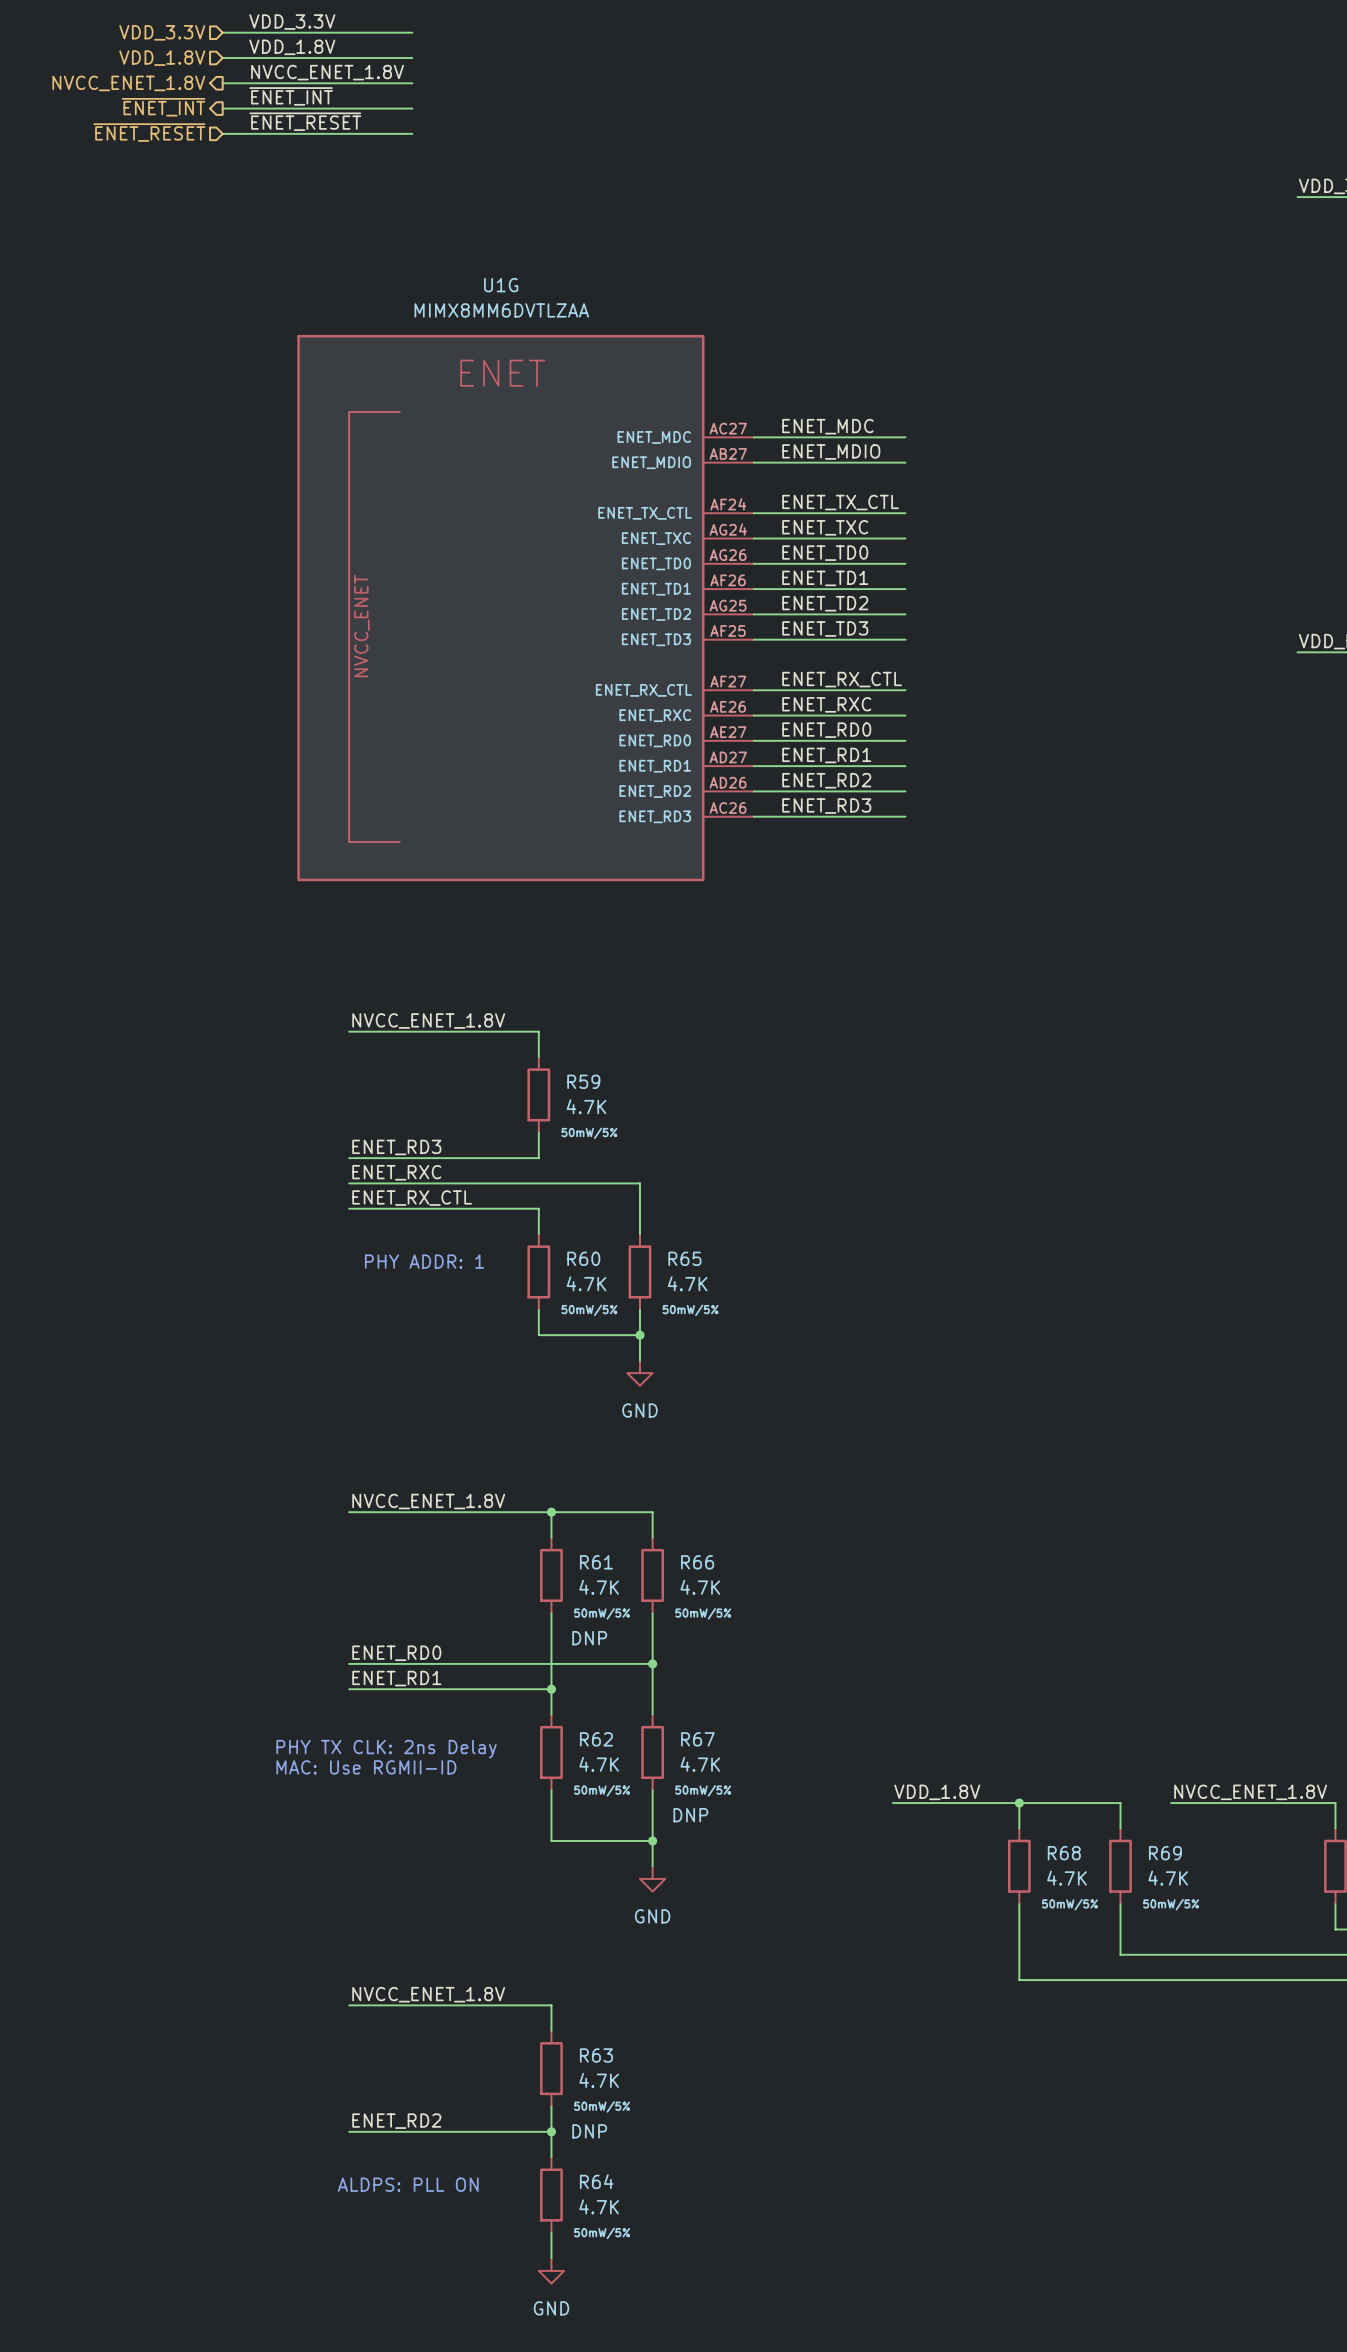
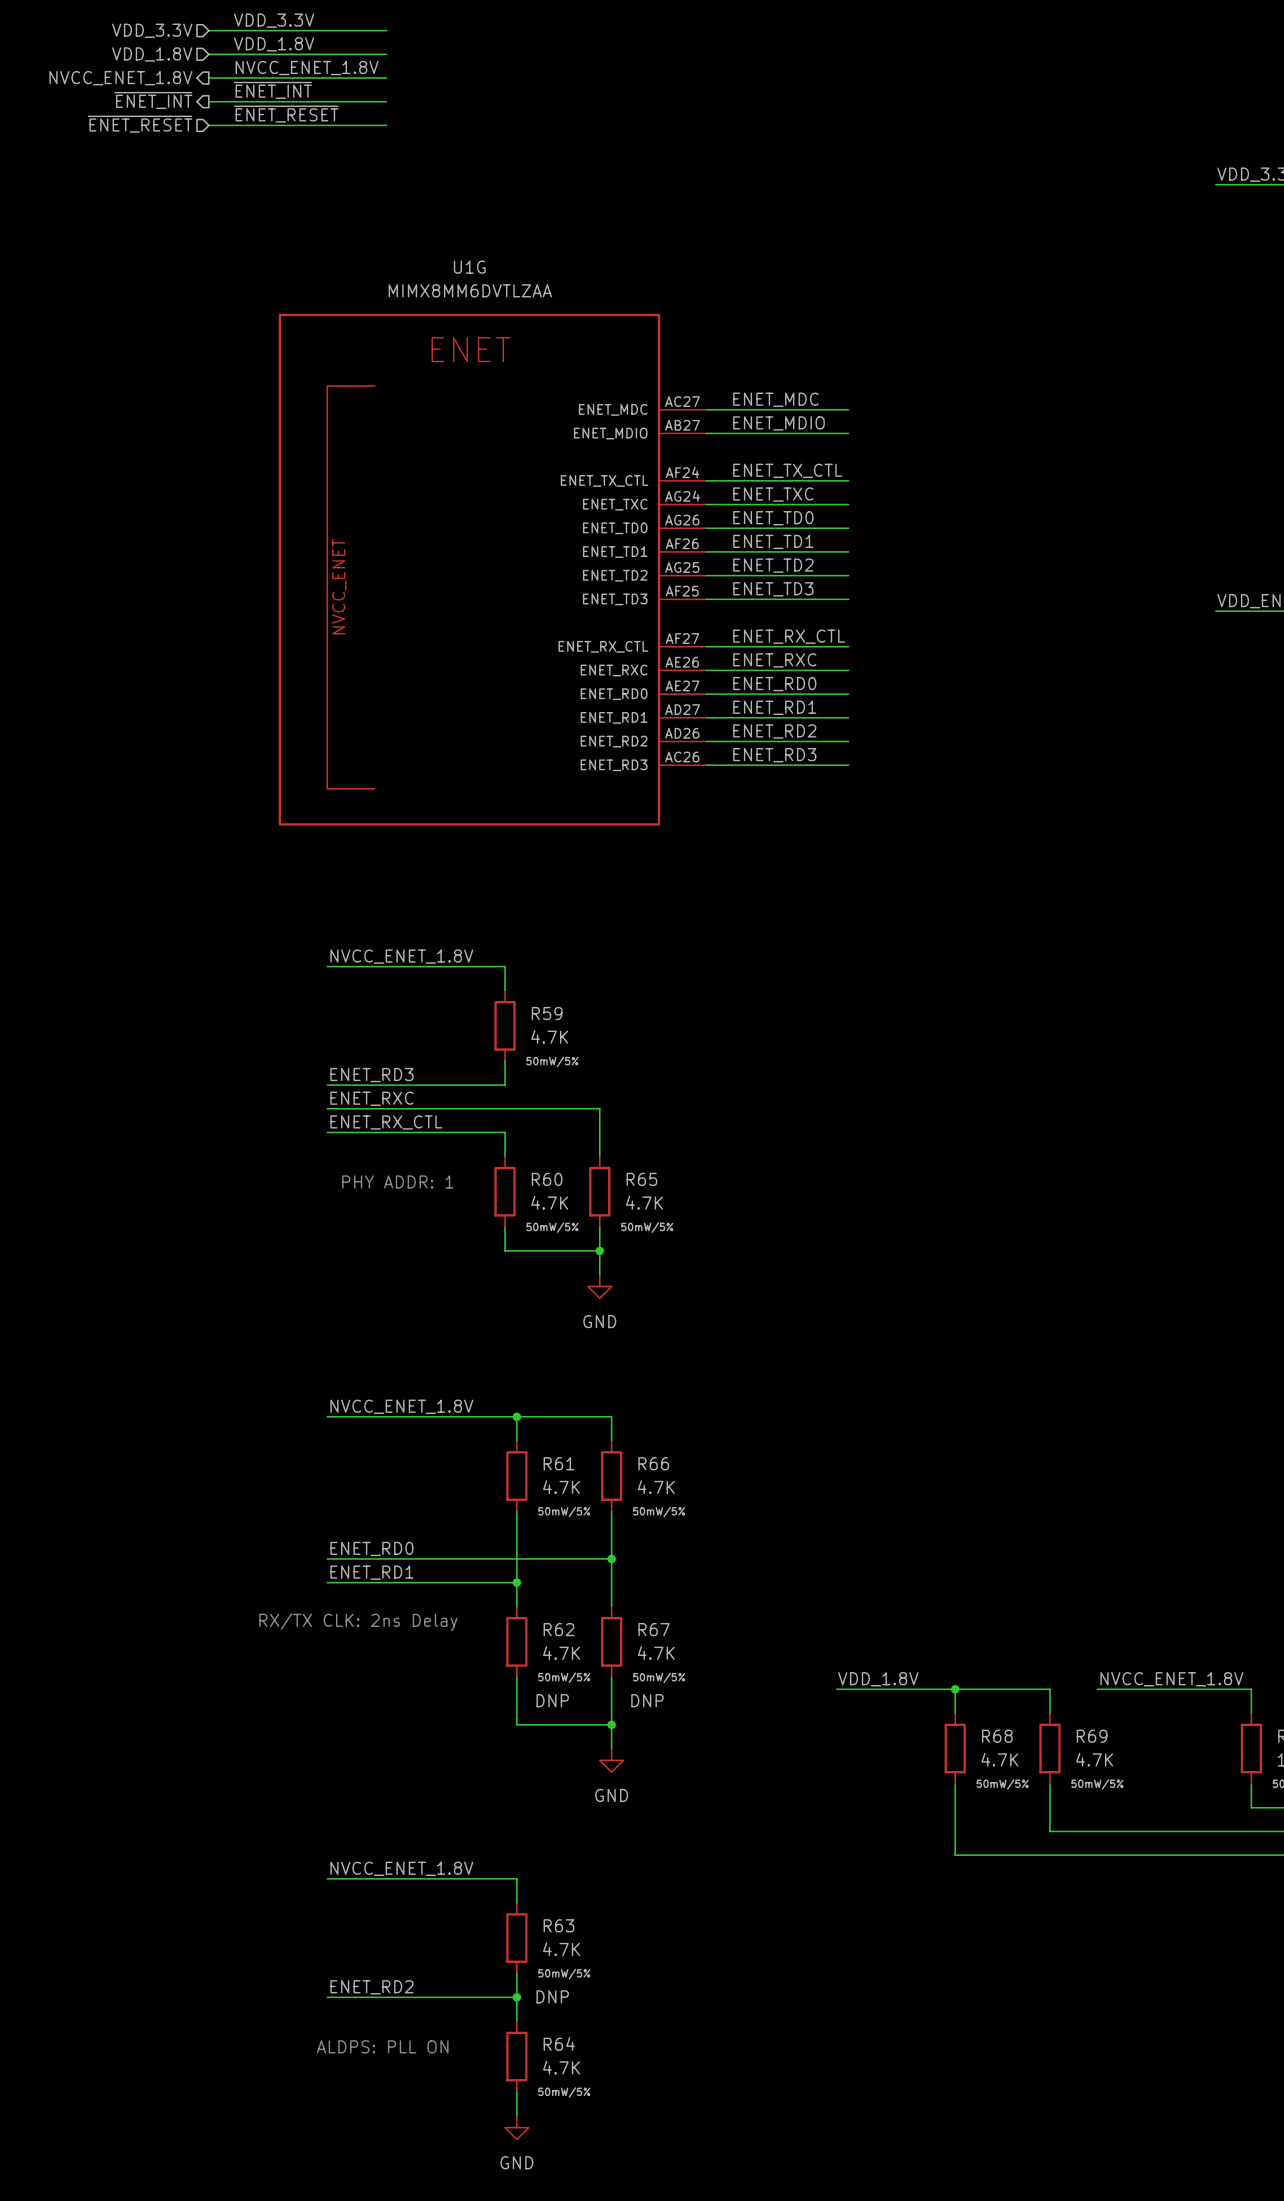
R61 text: DNP (589, 1638) -> none
text: PHY TX CLK: 2ns Delay (386, 1749) -> RX/TX CLK: 2ns Delay (358, 1622)
text: MAC: Use RGMII-ID (366, 1767) -> none
R62 text: none -> DNP (552, 1700)

